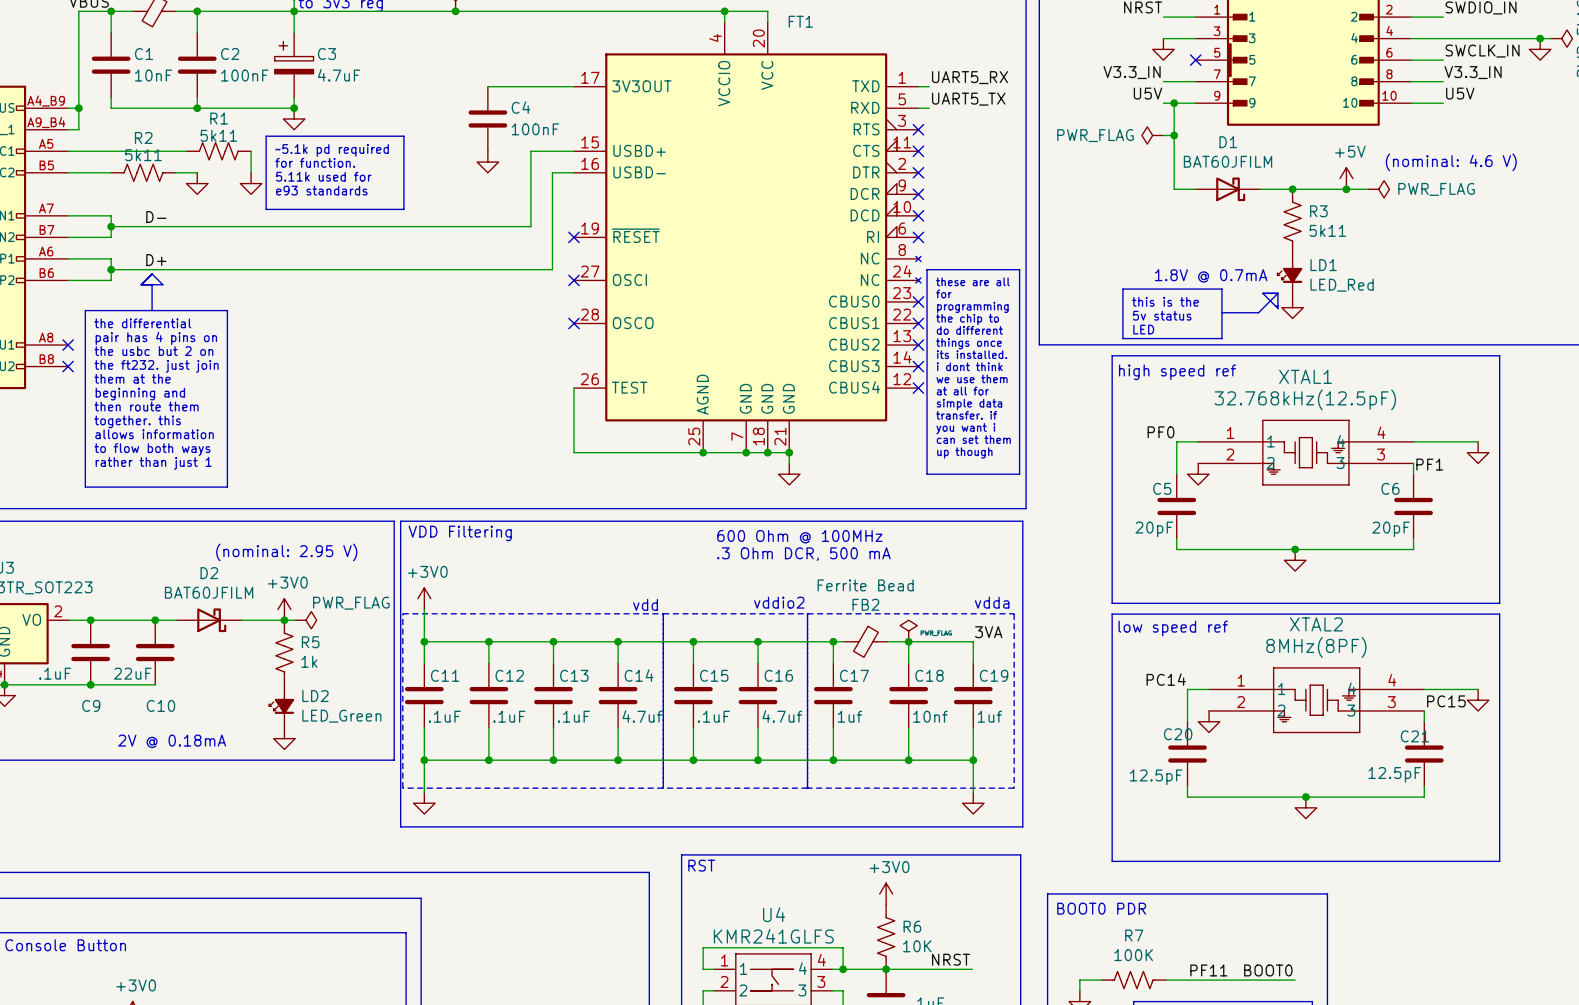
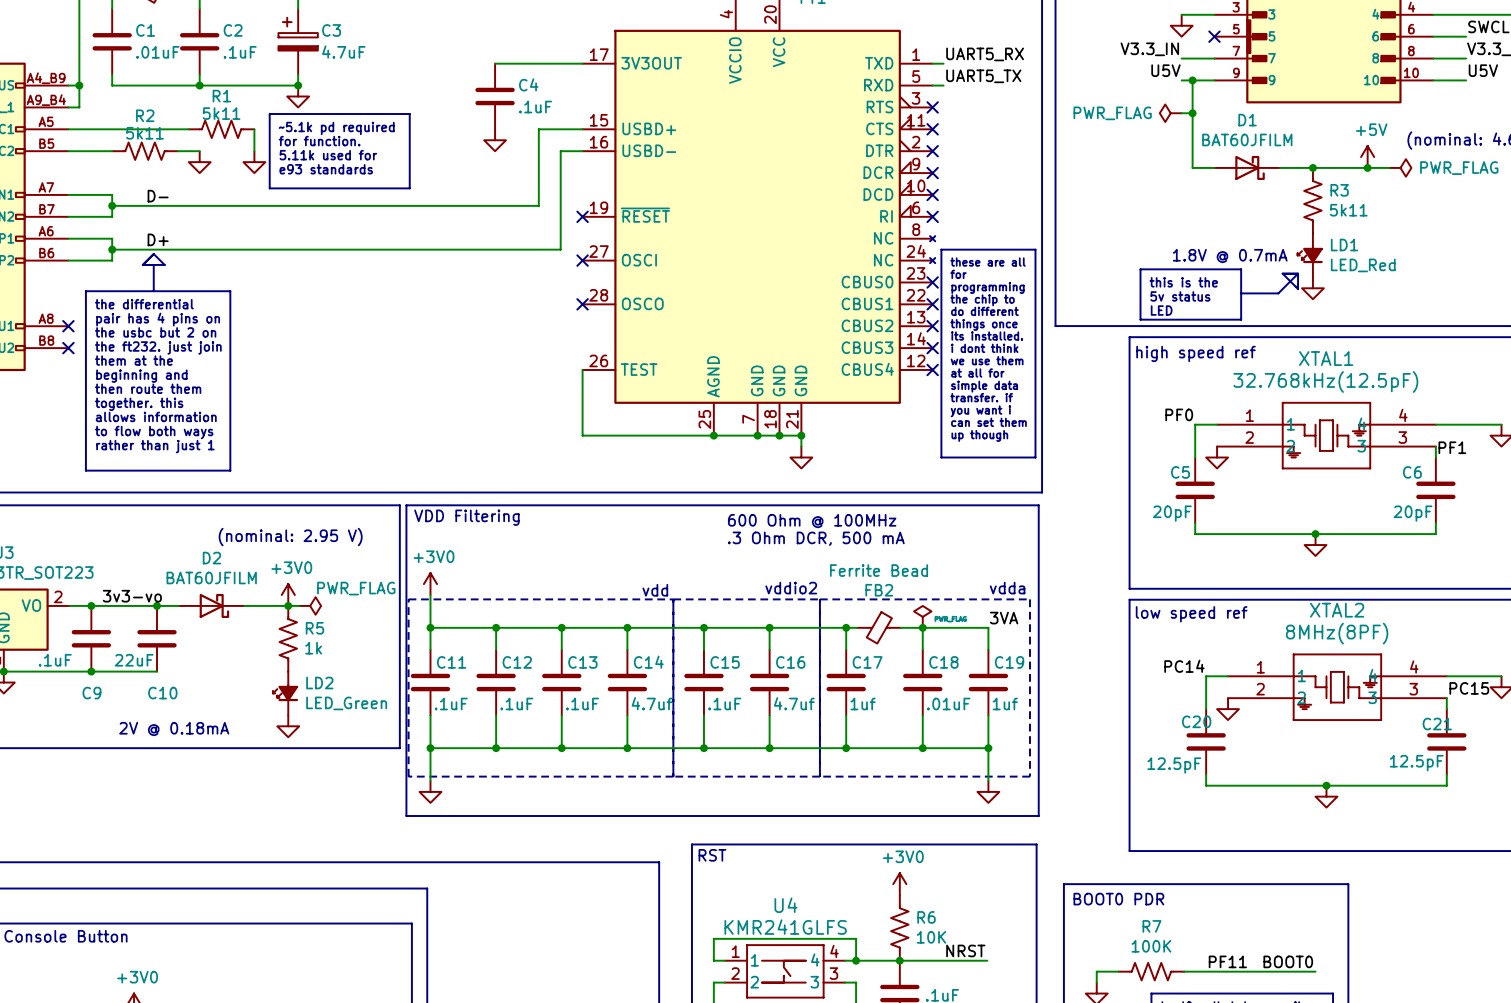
C1 value: 10nF (153, 75) -> .01uF (157, 52)
C2 value: 100nF (244, 75) -> .1uF (240, 52)
C4 value: 100nF (535, 129) -> .1uF (535, 107)
label: none -> 3v3-vo (132, 596)
C18 value: 10nf (930, 716) -> .01uF (948, 704)

